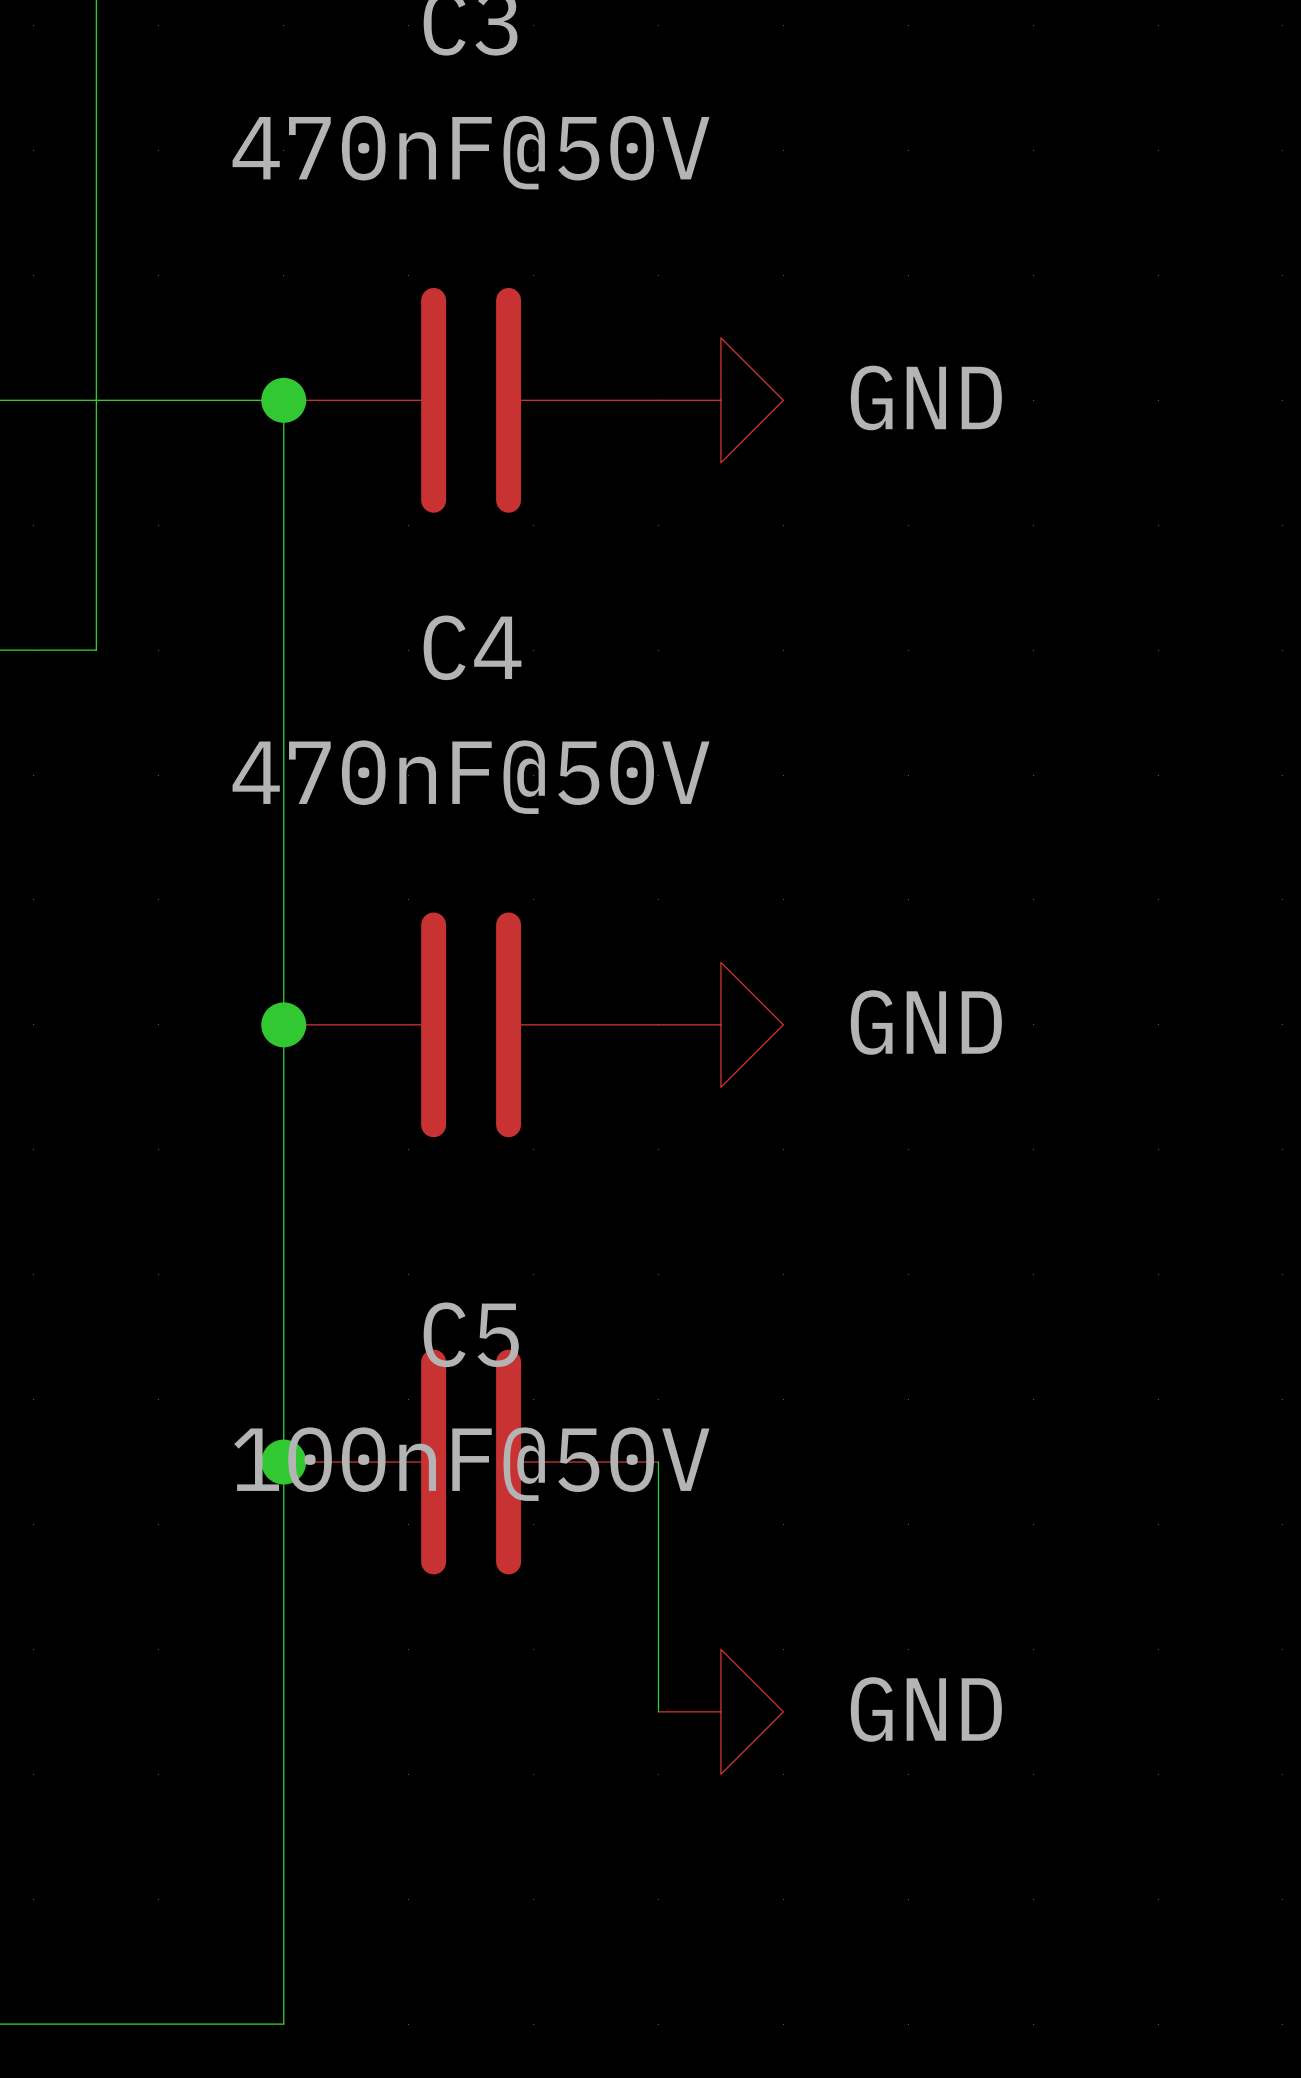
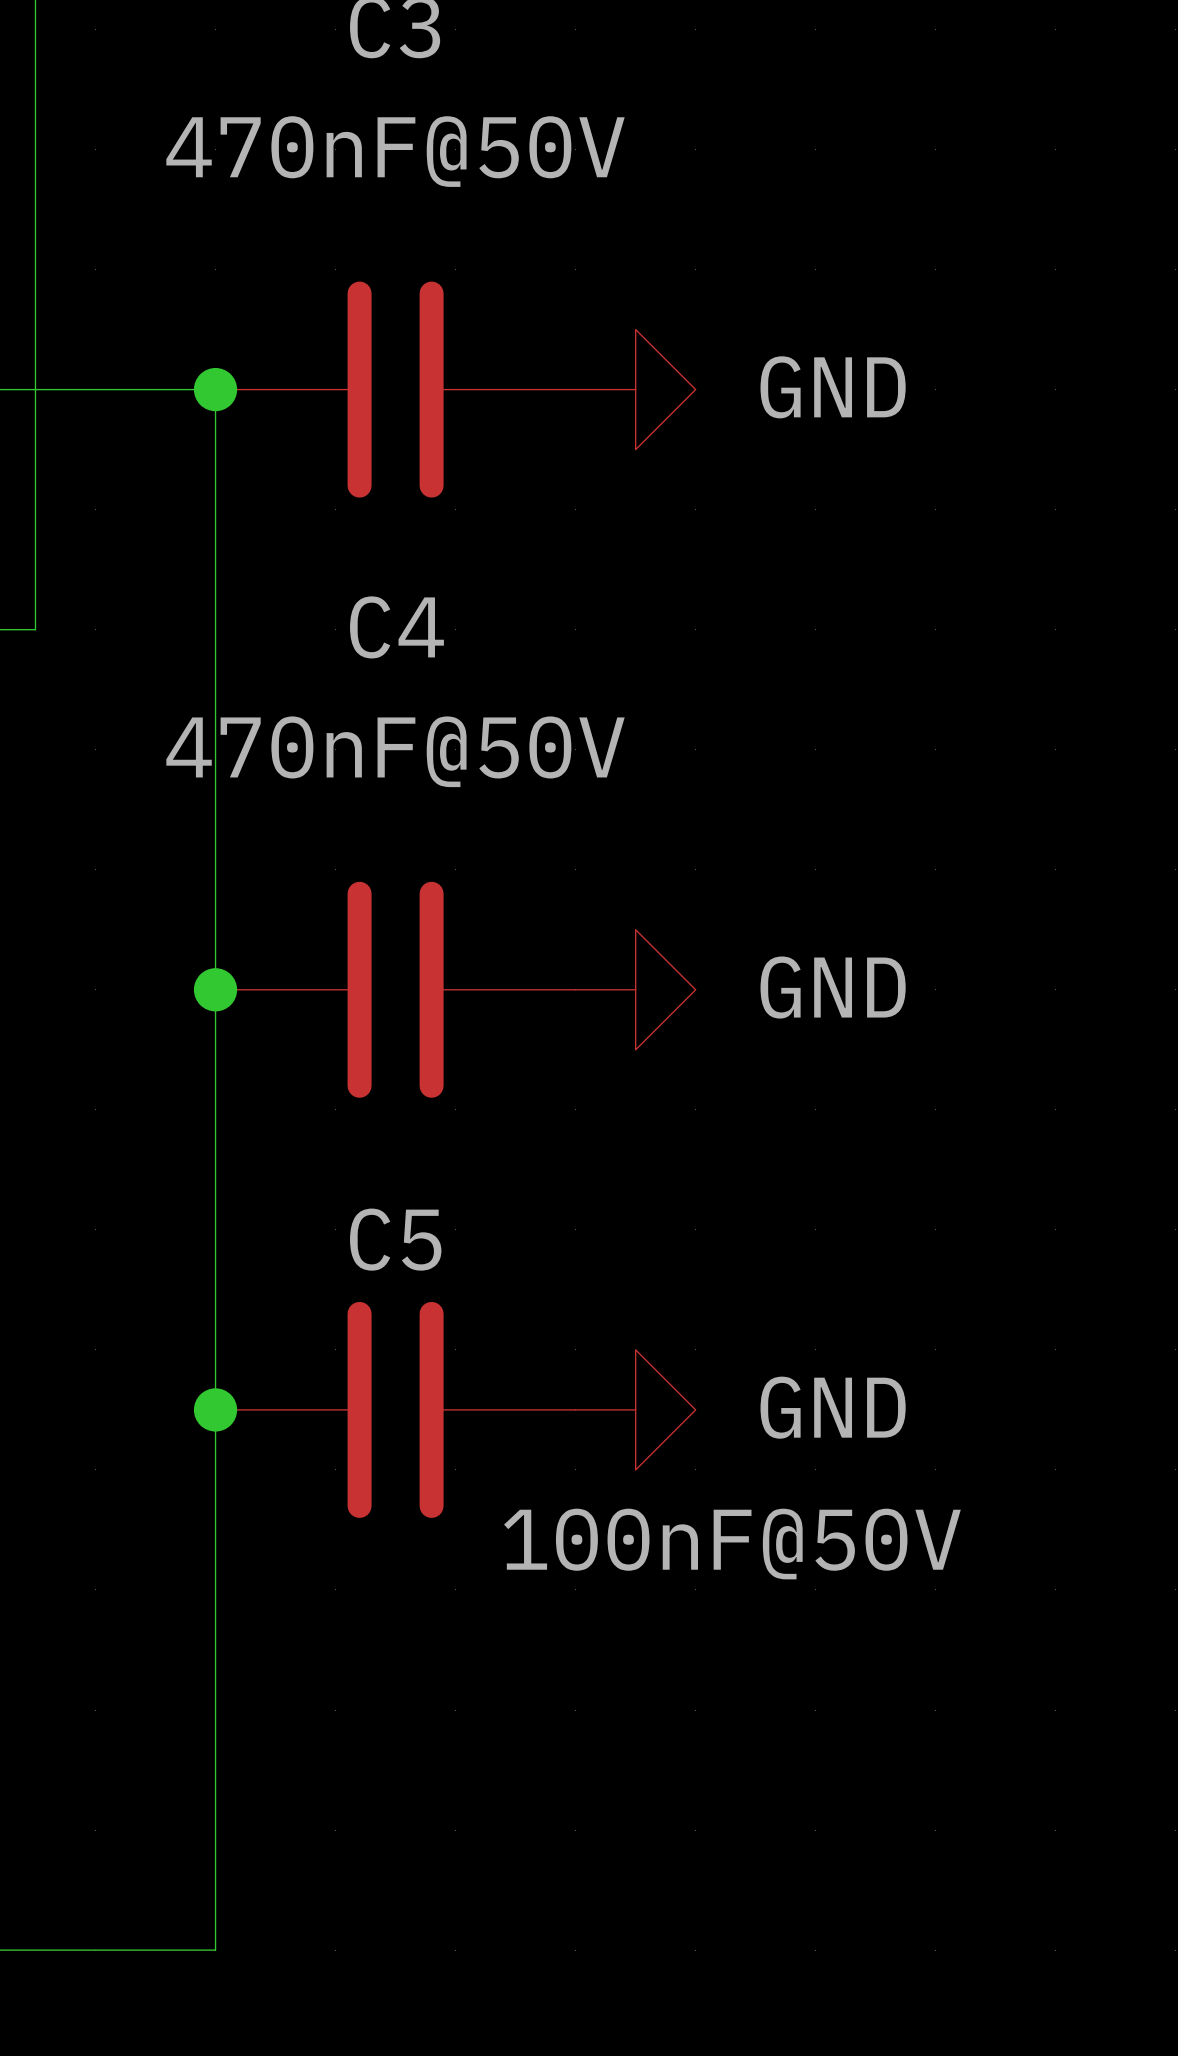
C5 name position: C5 (471, 1334) -> C5 (395, 1239)
wire: (658, 1462) (658, 1711) -> none
C5 value position: 100nF@50V (471, 1464) -> 100nF@50V (732, 1544)
power symbol position: GND (720, 1711) -> GND (635, 1409)

